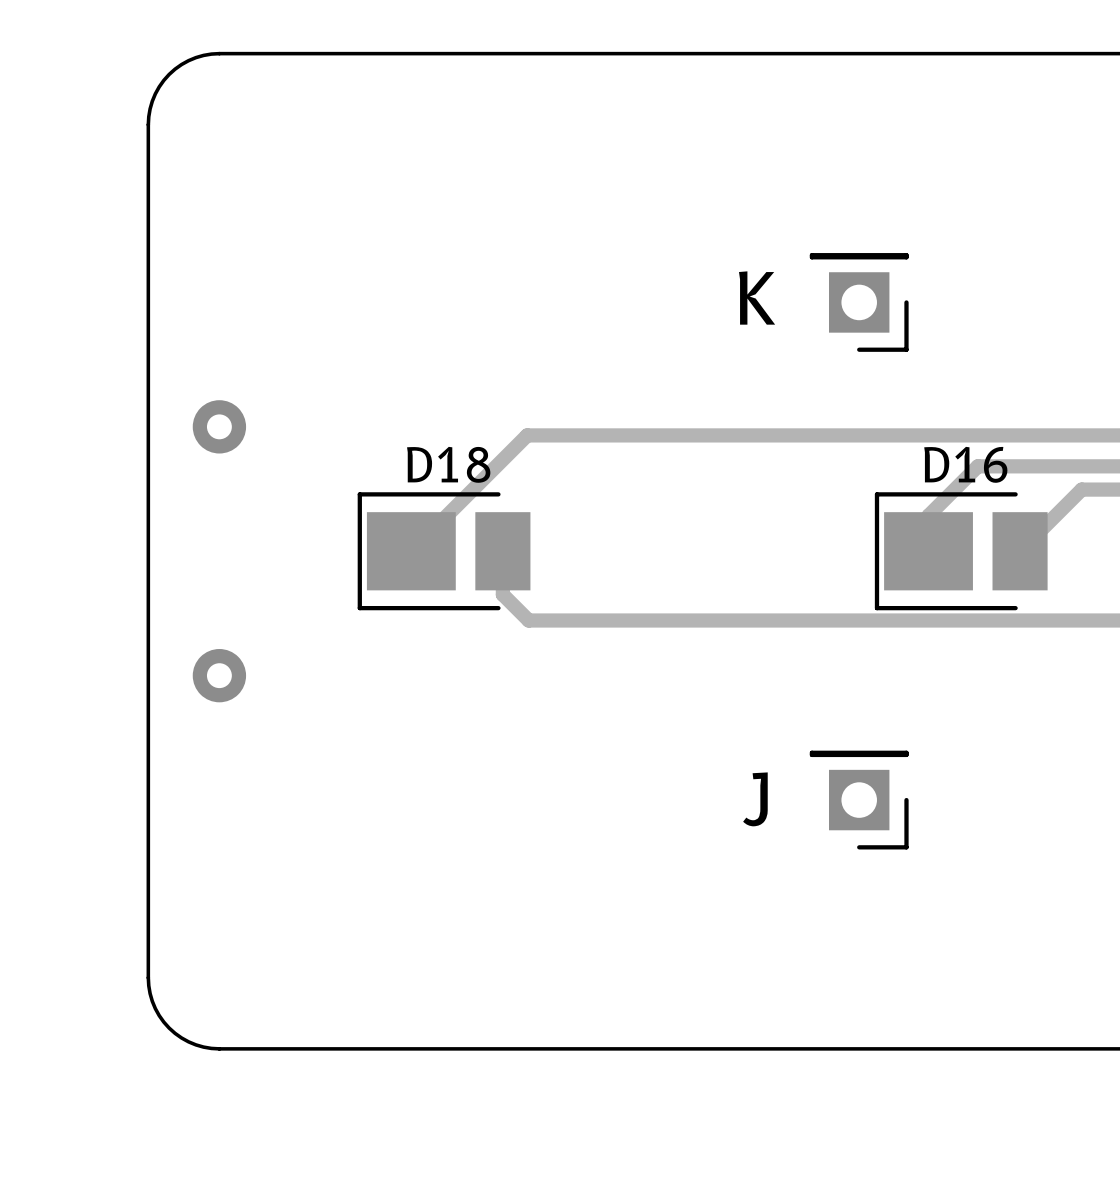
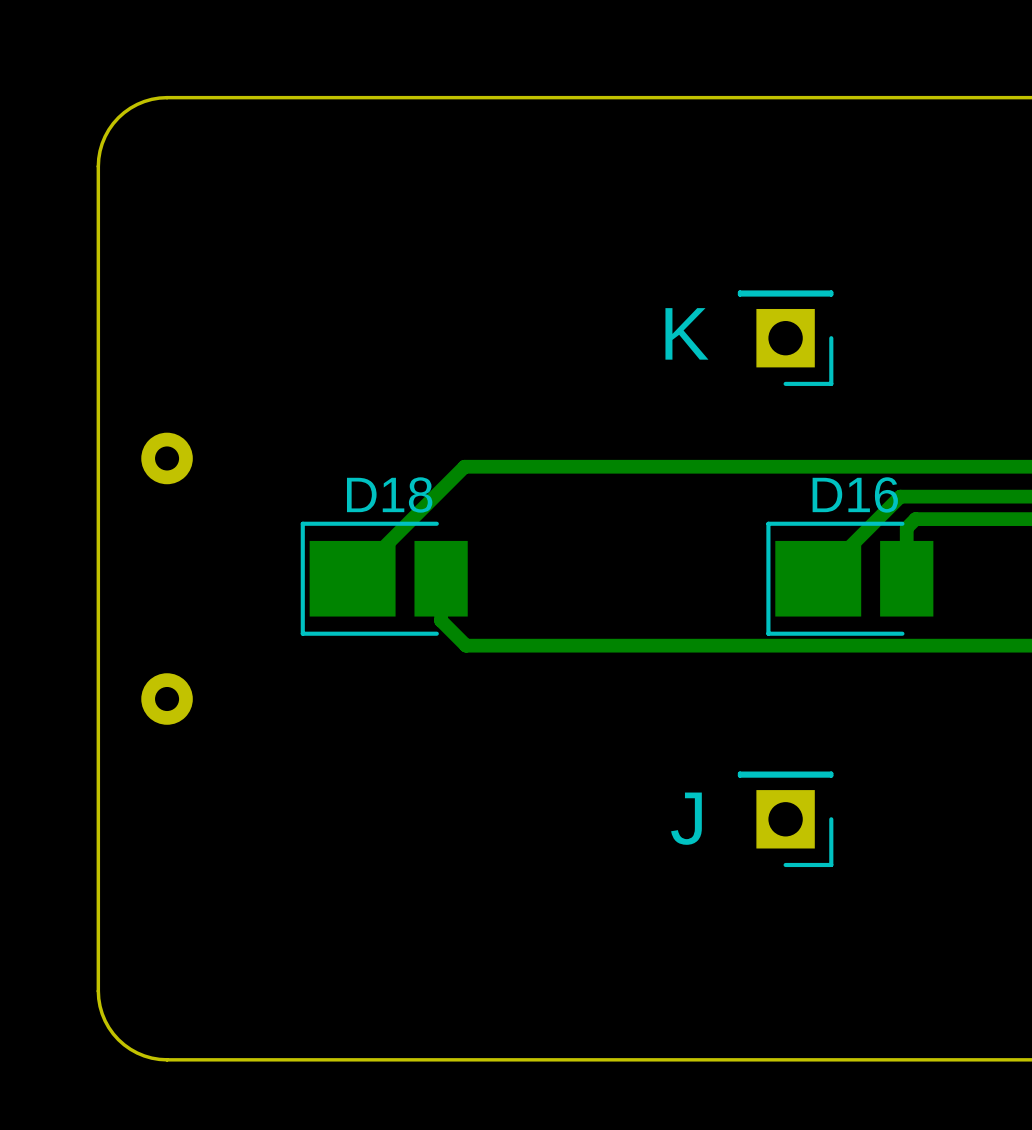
track: (1081, 489) (1020, 551) -> (1000, 519) (915, 519) (906, 527) (906, 578)
D16 position: (961, 551) -> (849, 578)

